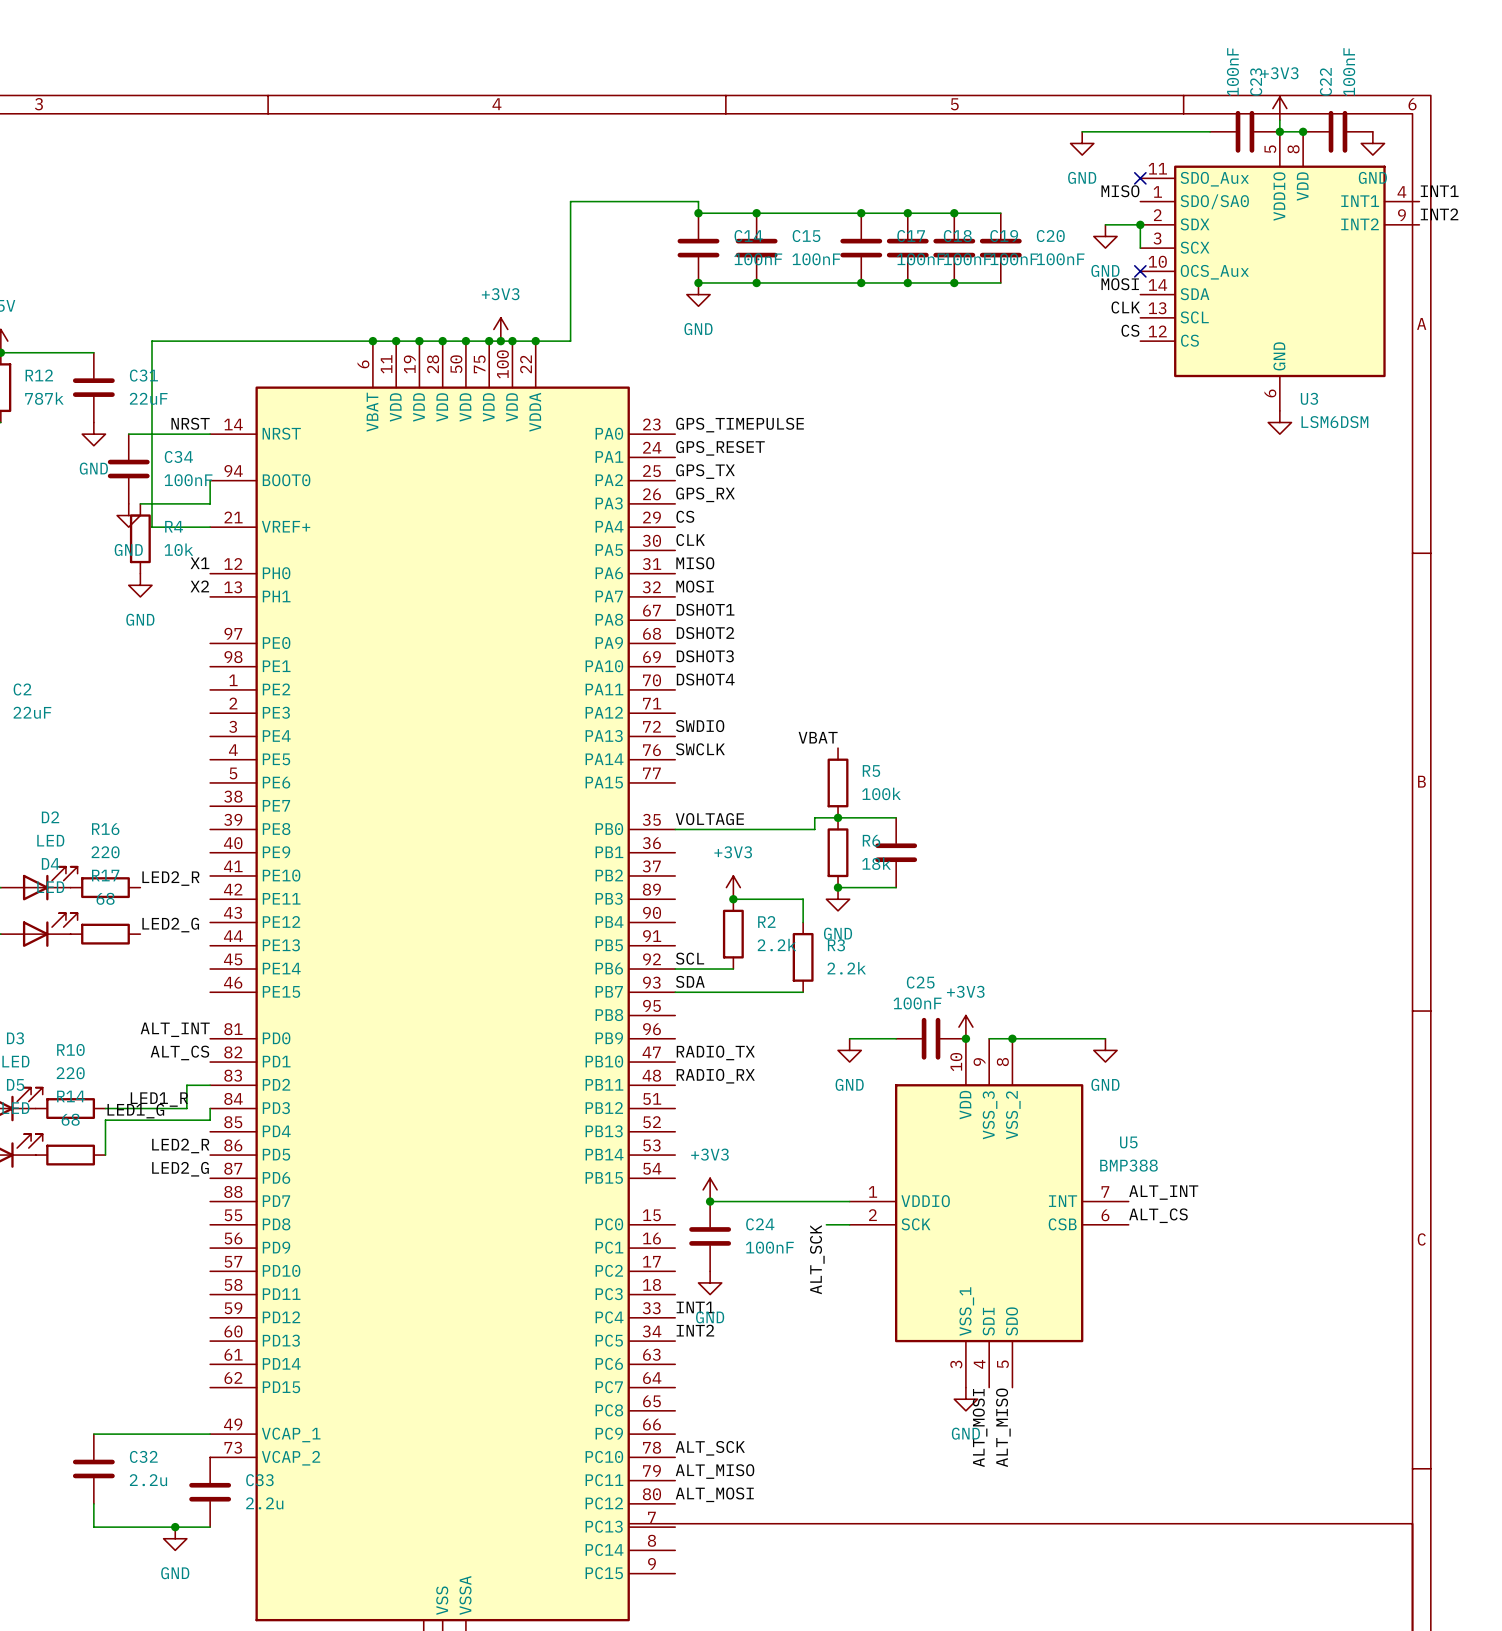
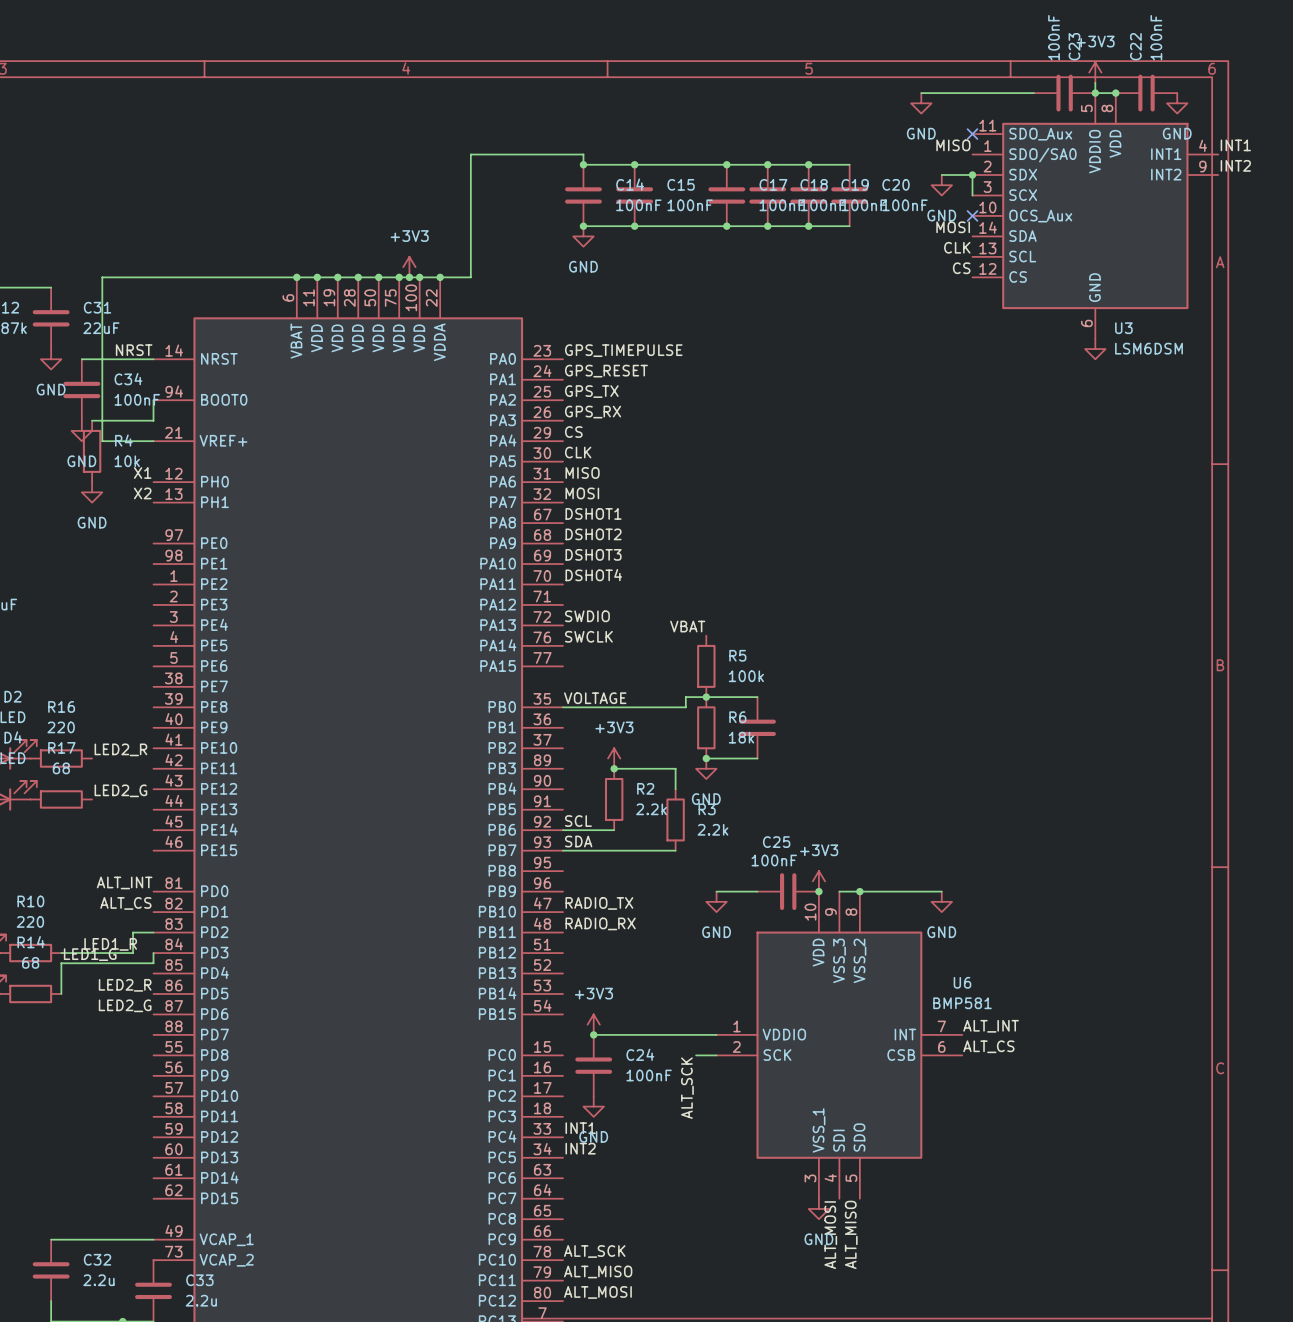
U5 name: U5 (1128, 1142) -> U6 (962, 982)
U5 value: BMP388 (1128, 1165) -> BMP581 (962, 1003)

